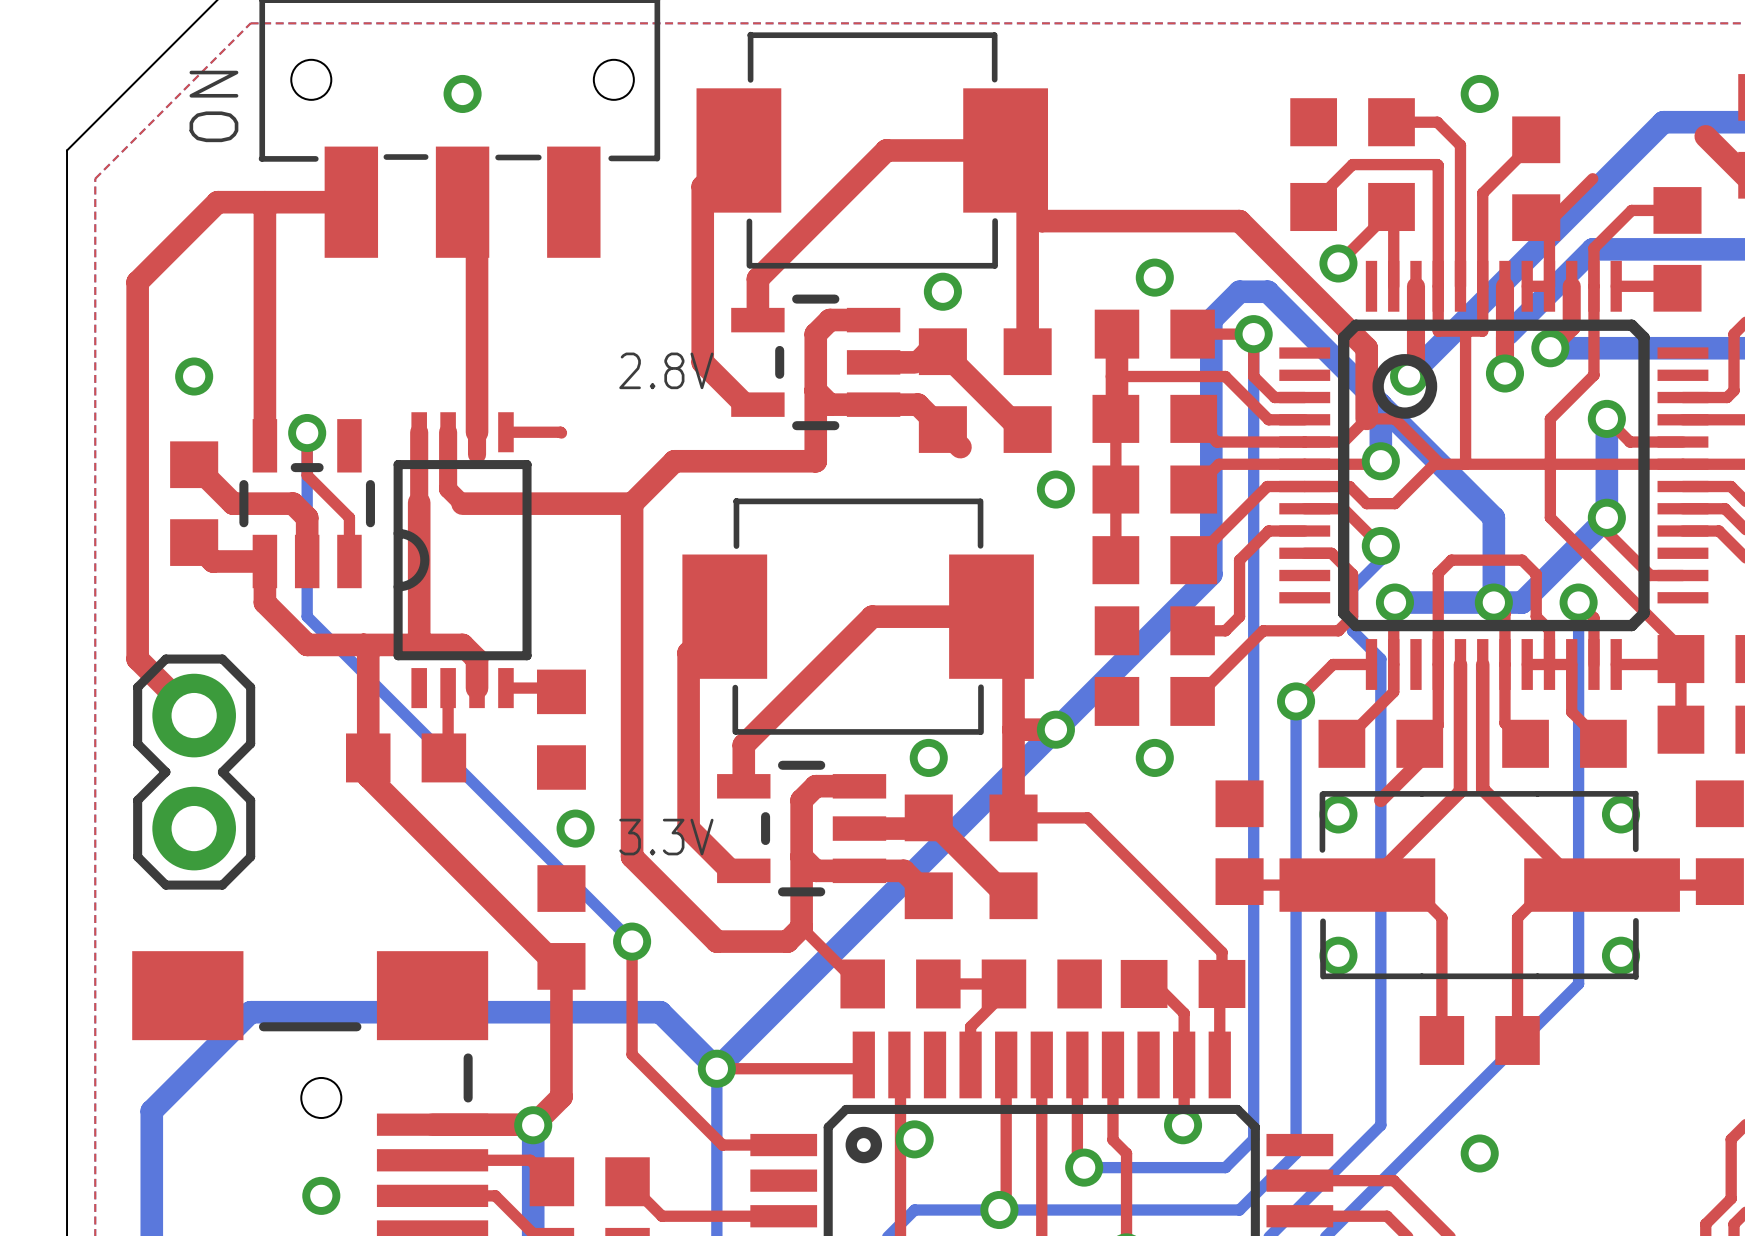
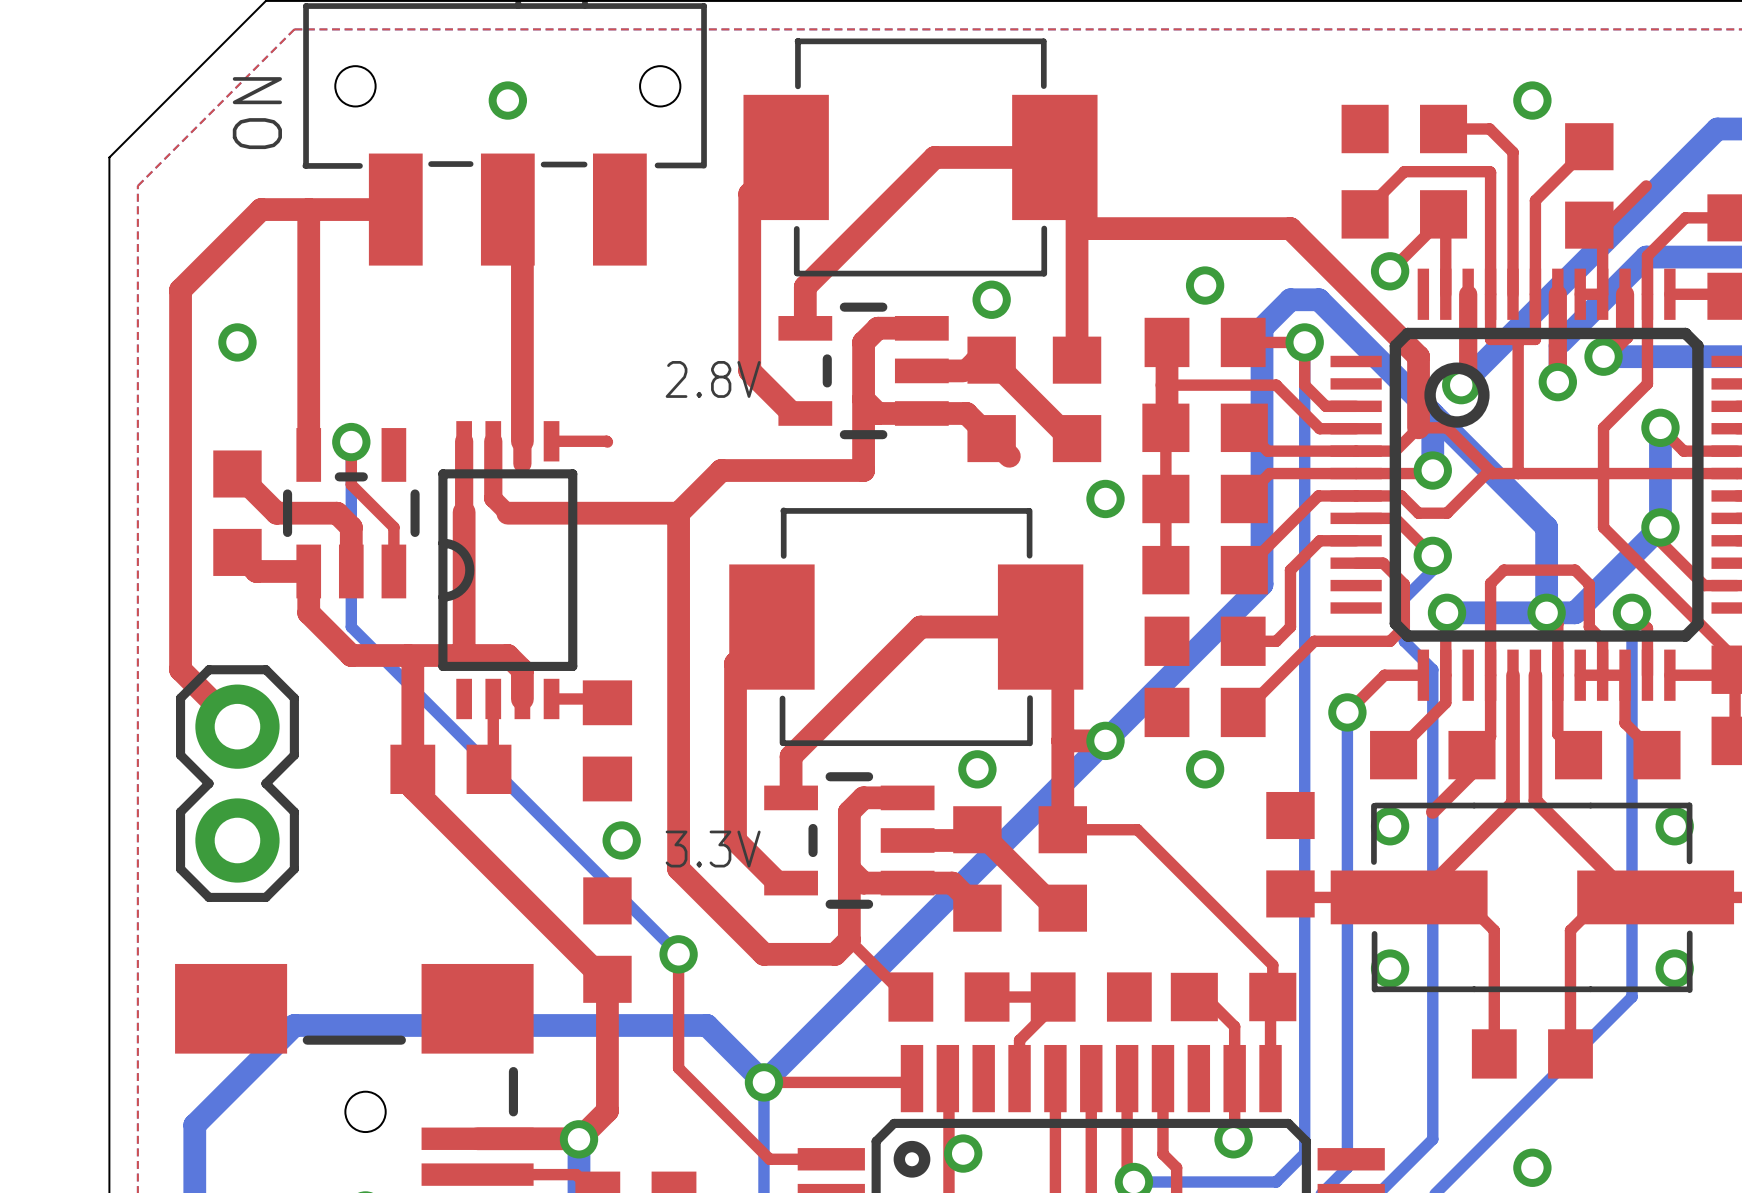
via position: (194, 376) -> (237, 342)

